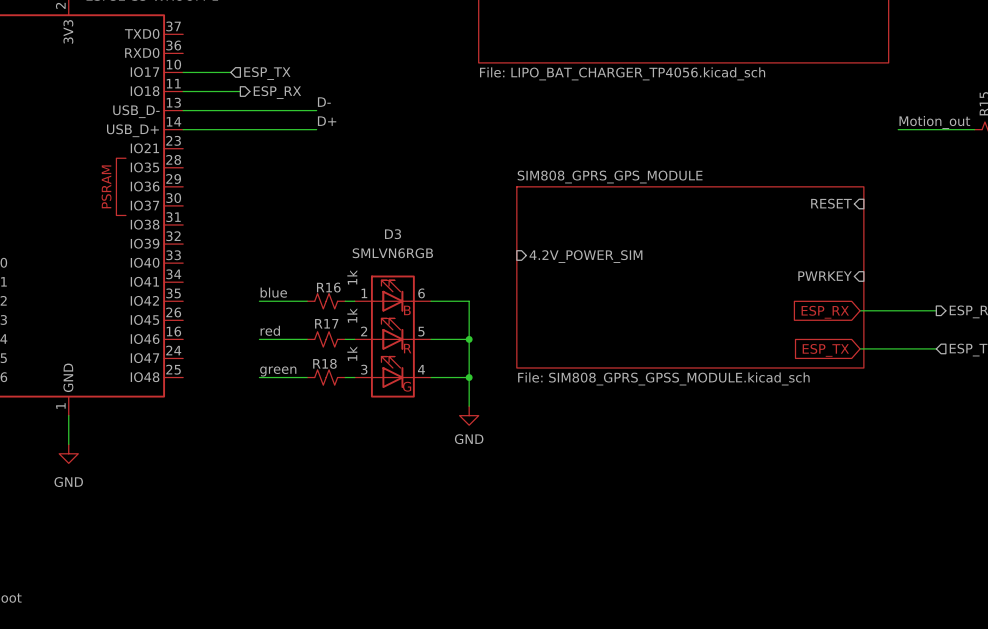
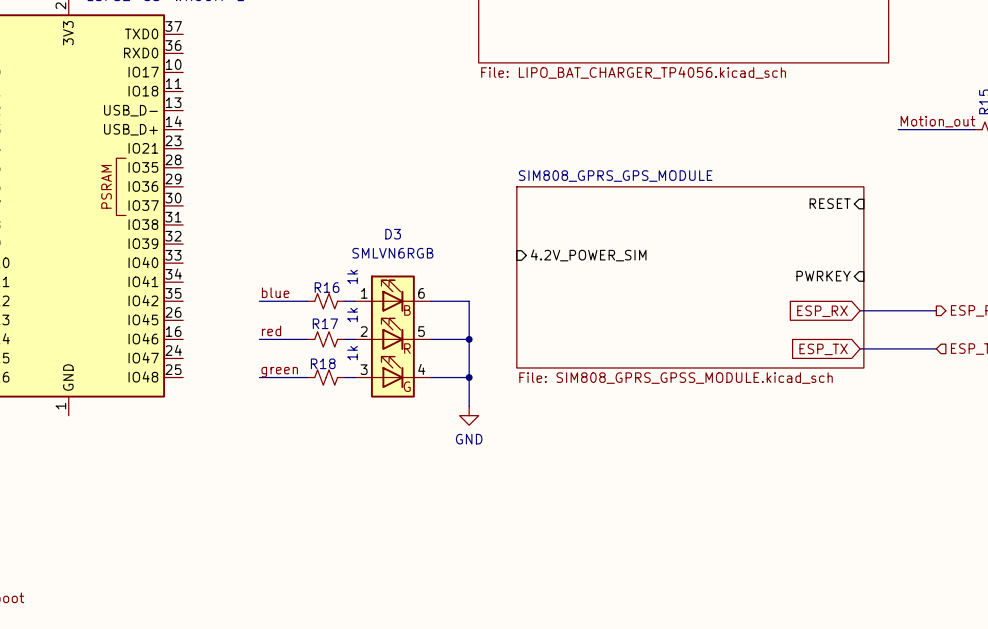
wire: (183, 72) (230, 72) -> none
hierarchical label: ESP_TX (267, 73) -> none
wire: (183, 91) (240, 91) -> none
hierarchical label: ESP_RX (277, 92) -> none
label: D- (324, 102) -> none
wire: (183, 110) (316, 110) -> none
label: D+ (327, 121) -> none
wire: (183, 129) (316, 129) -> none
wire: (68, 415) (68, 444) -> none
power symbol: GND (68, 453) -> none

